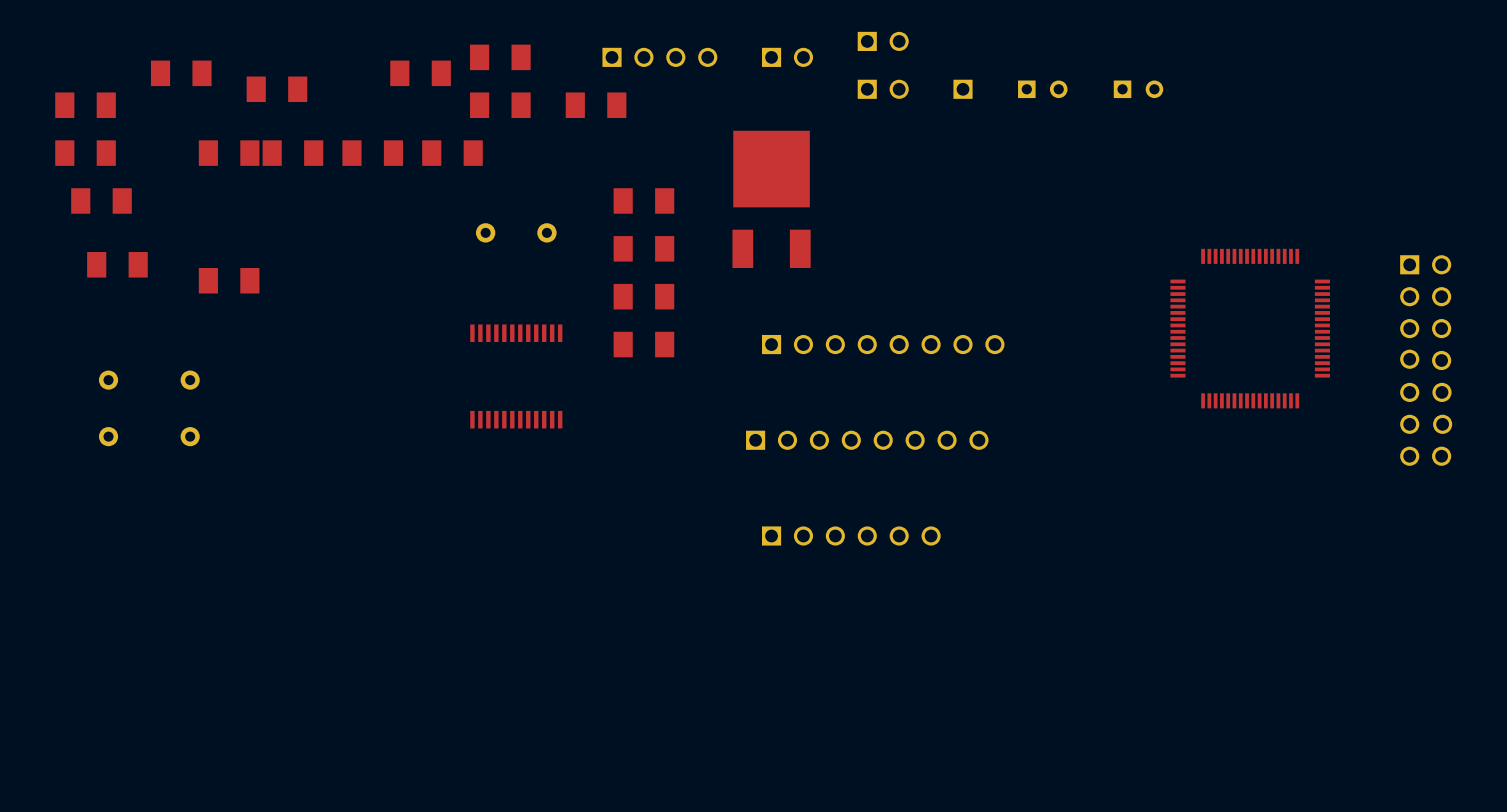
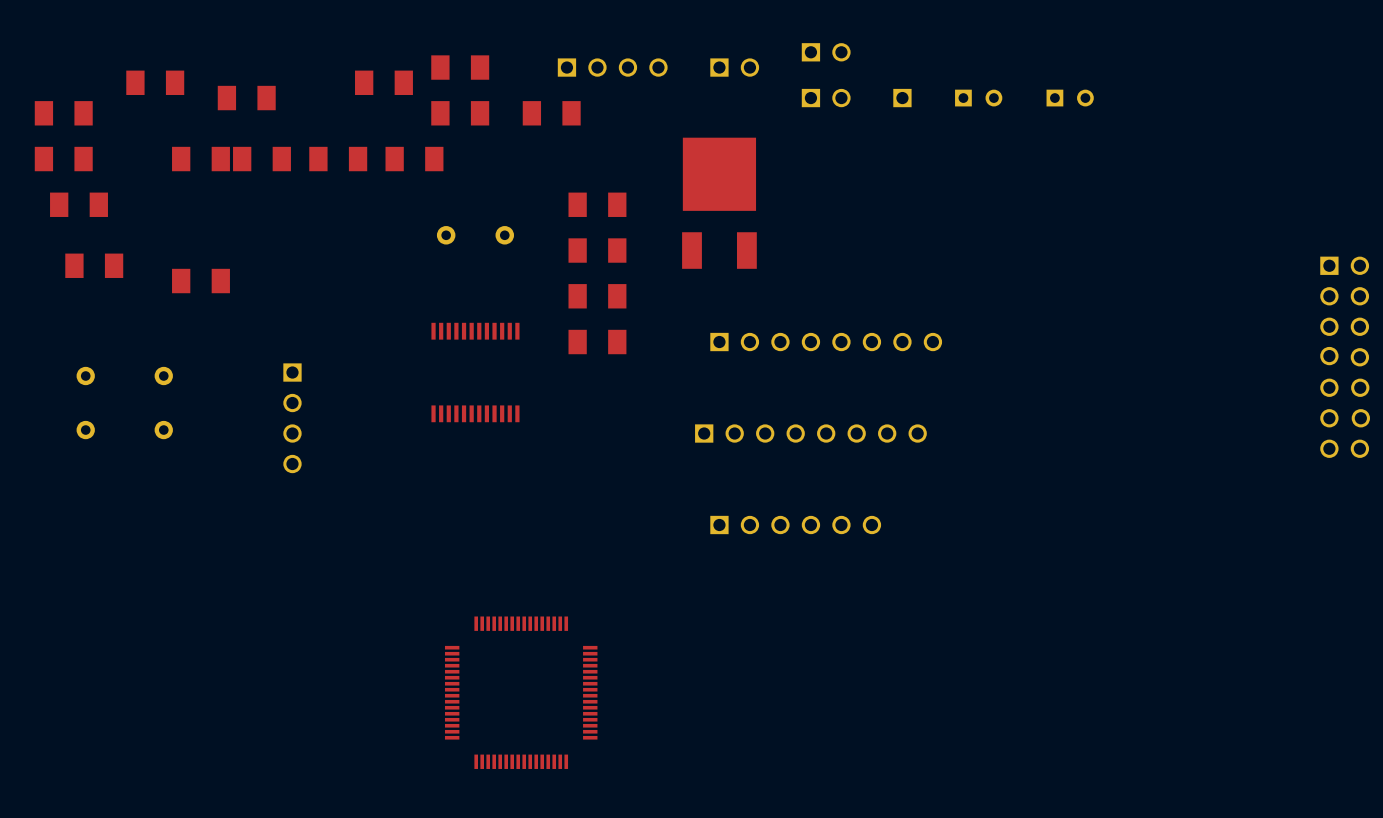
part: (1250, 328) -> none
part: none -> (292, 418)
part: none -> (521, 692)

